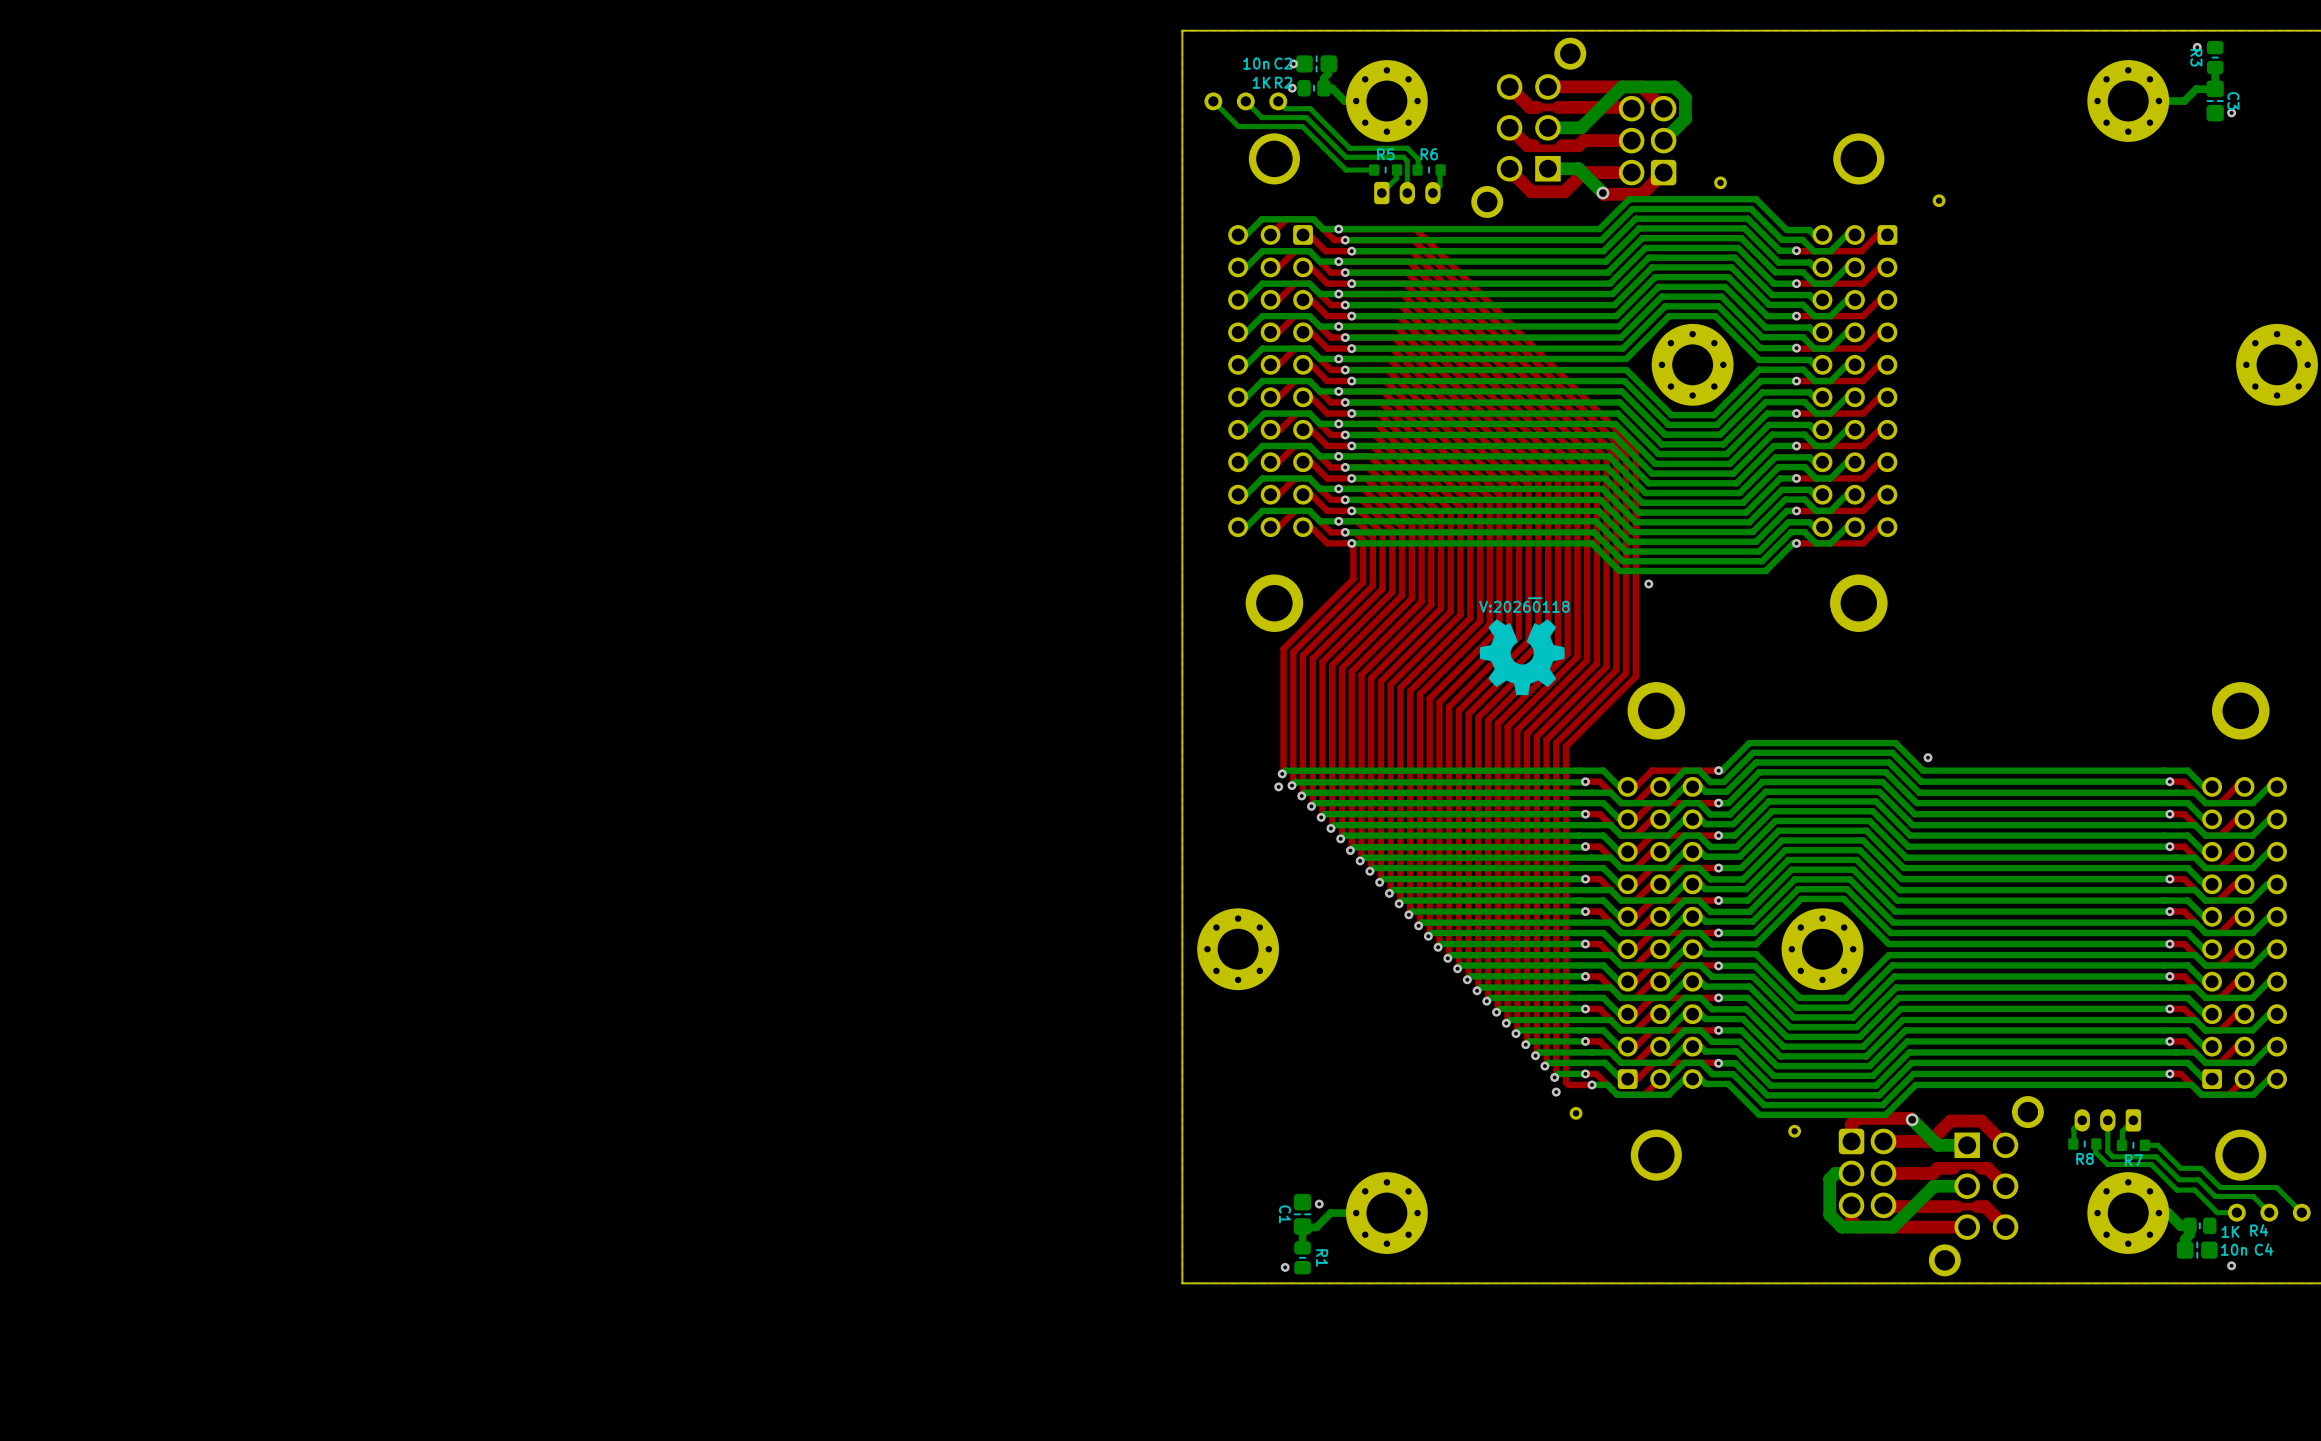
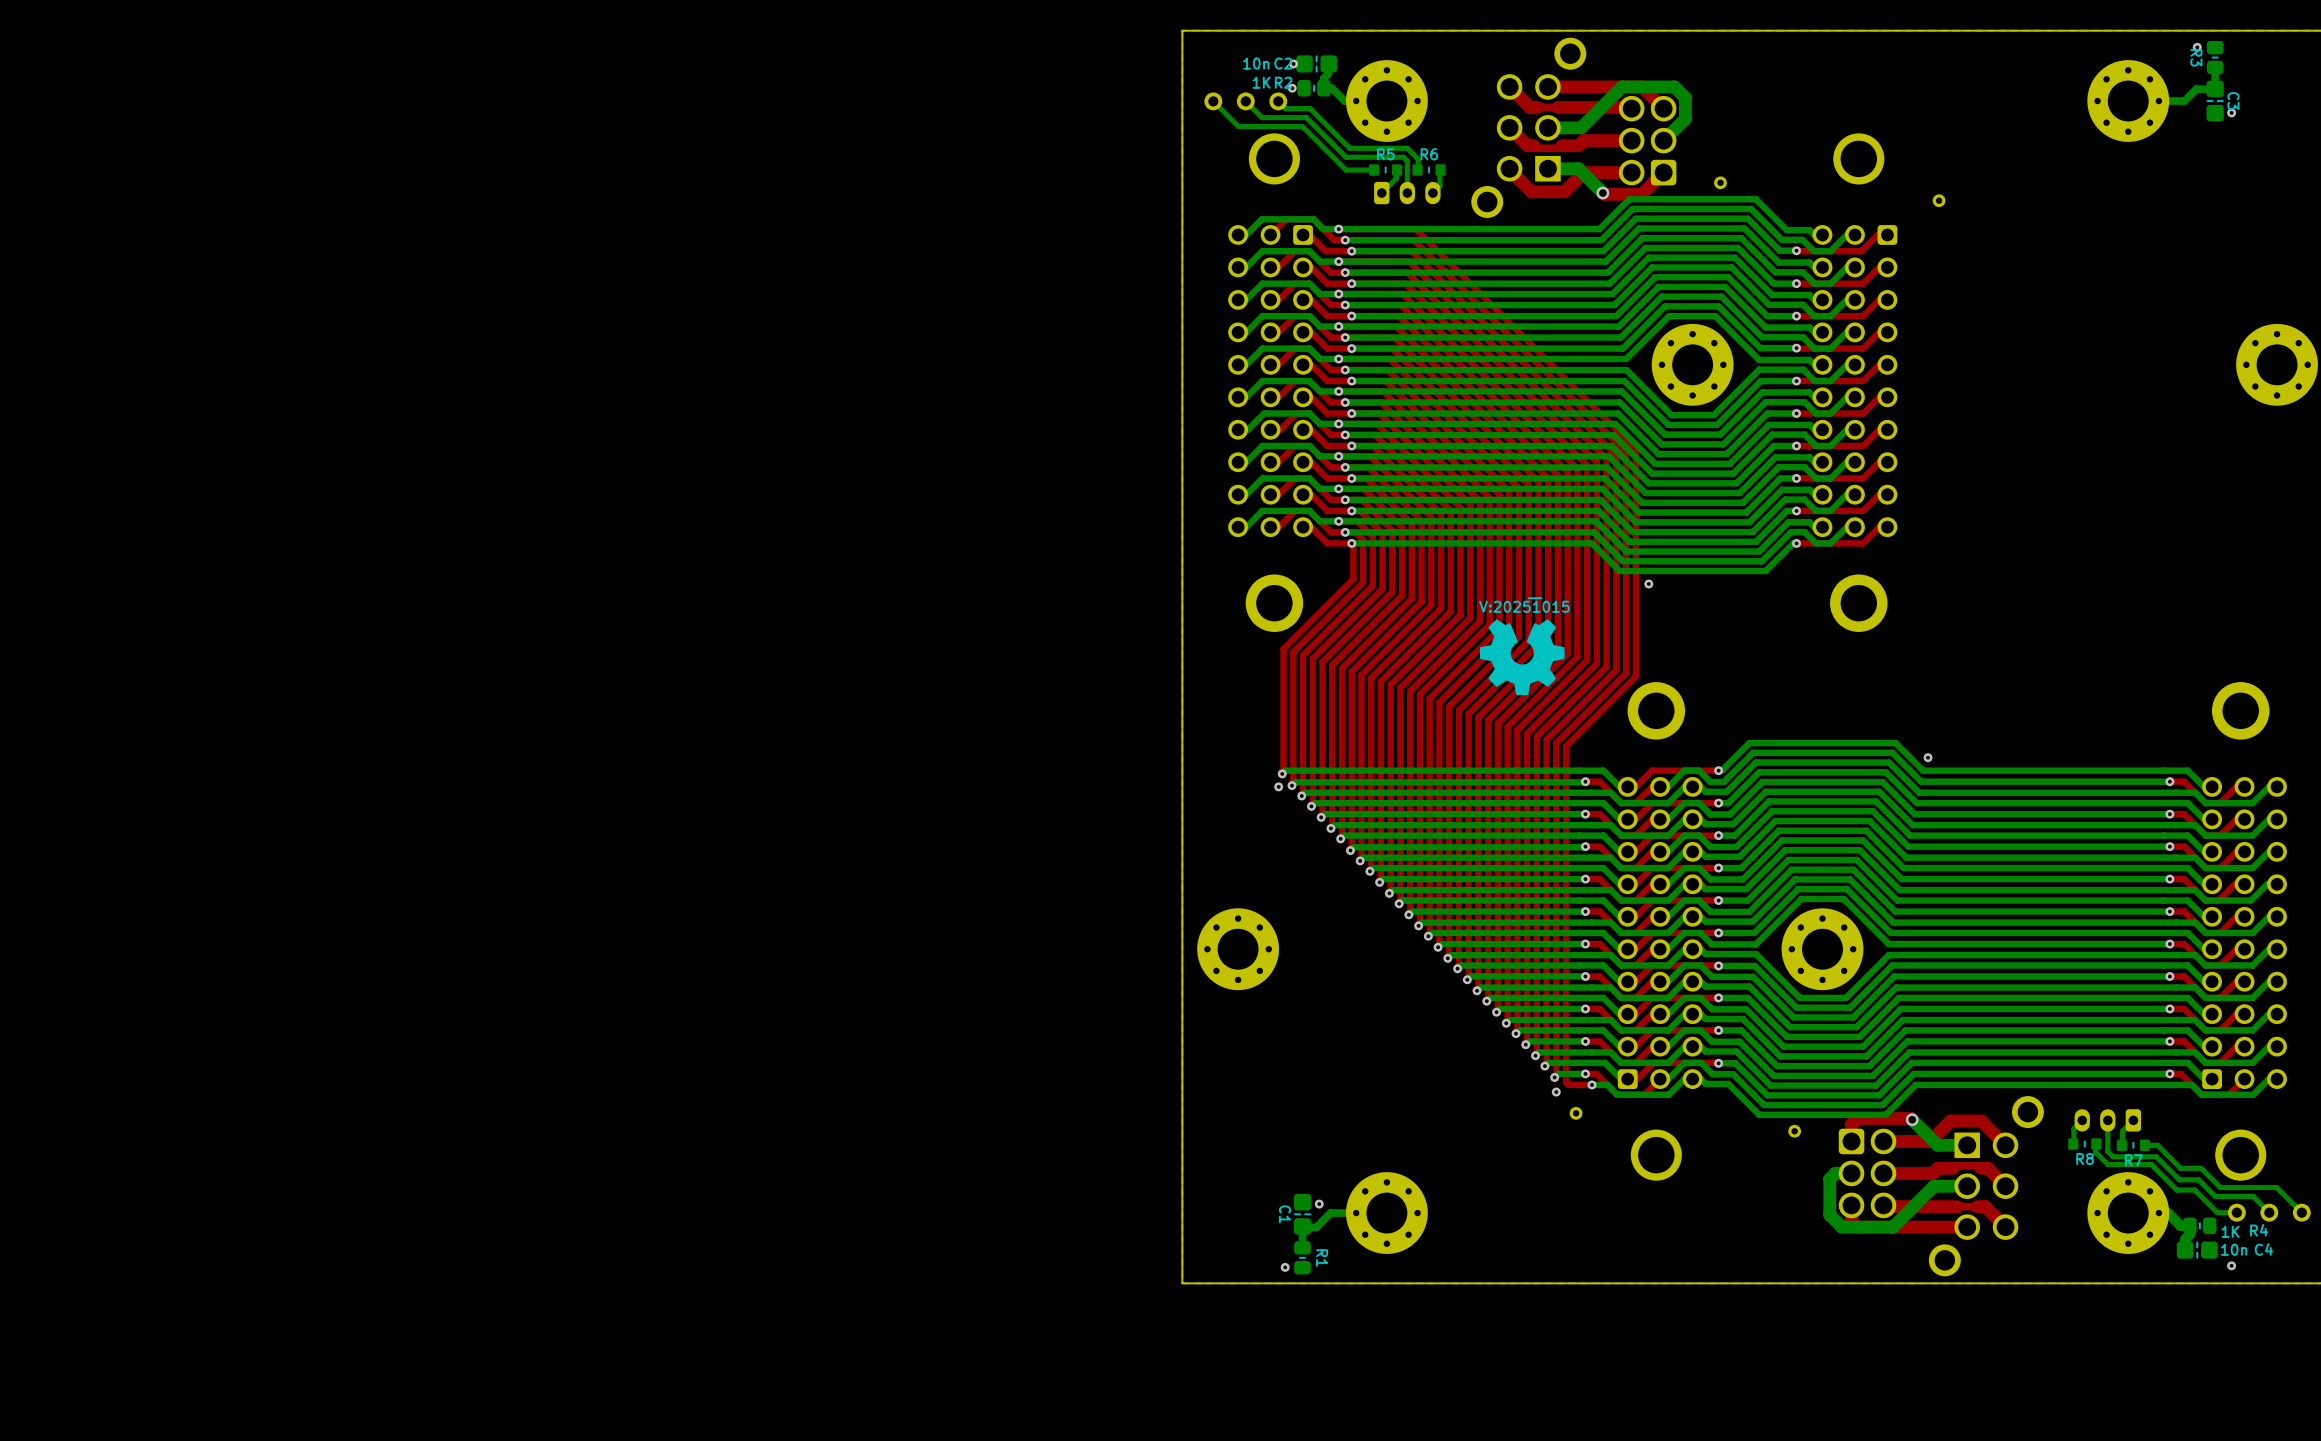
drawing shape: [1479, 597, 1570, 613] -> [1479, 597, 1570, 613]

